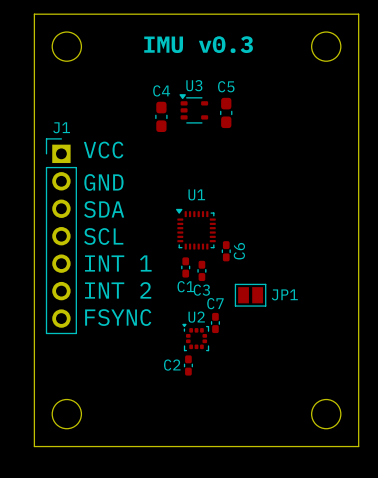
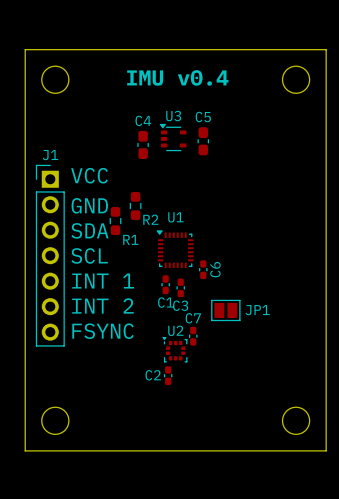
text: IMU v0.3 (198, 44) -> IMU v0.4 (177, 77)
R2: none -> (135, 206)
R1: none -> (115, 221)

